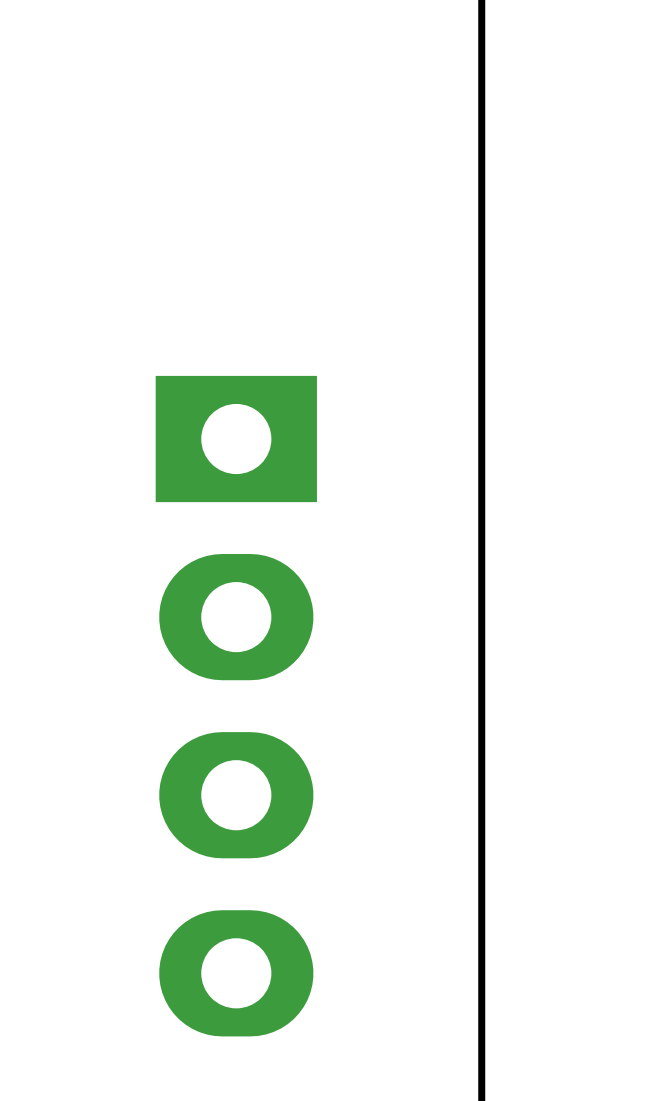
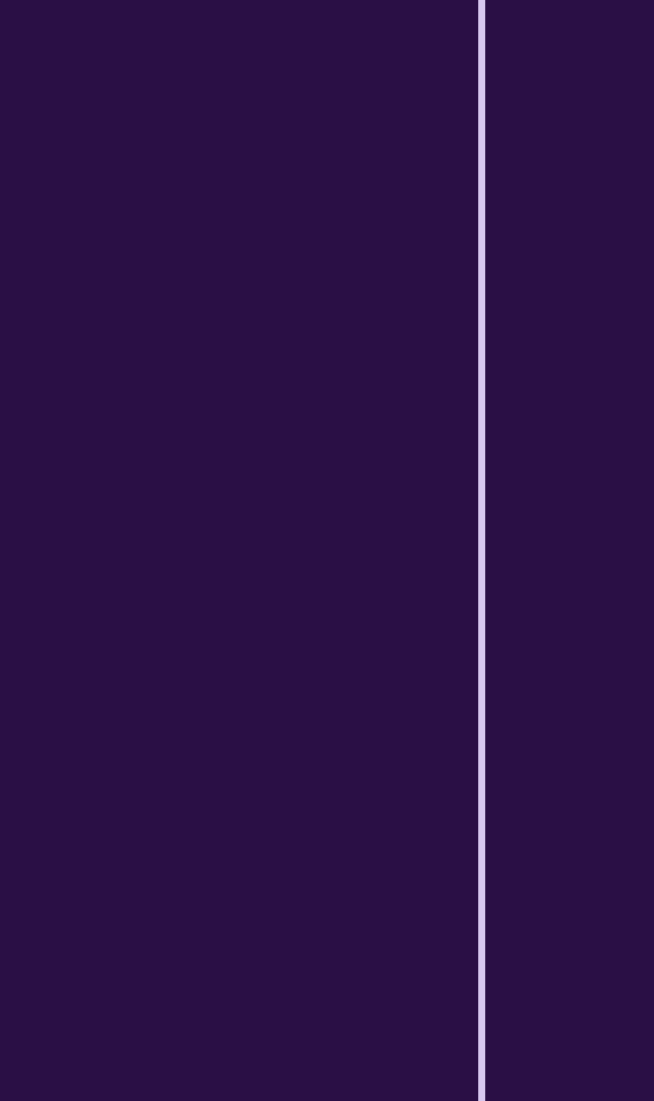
part: (236, 706) -> none

